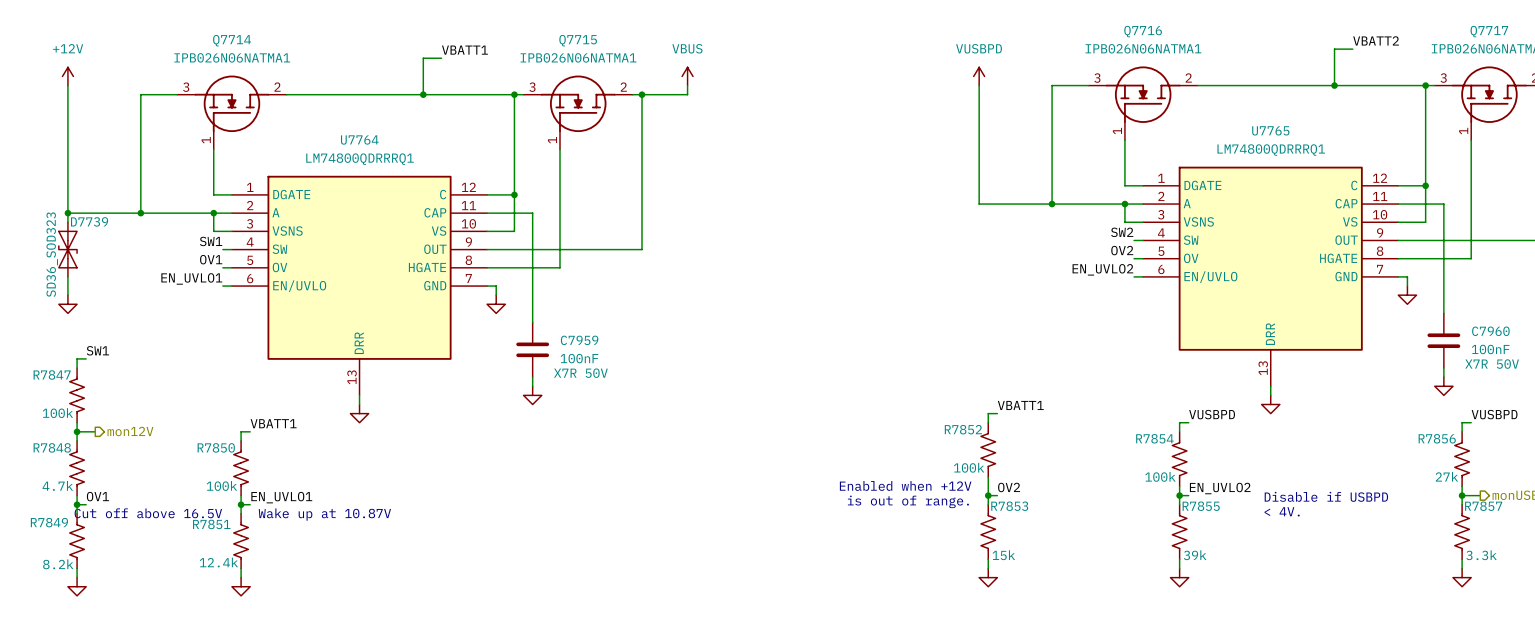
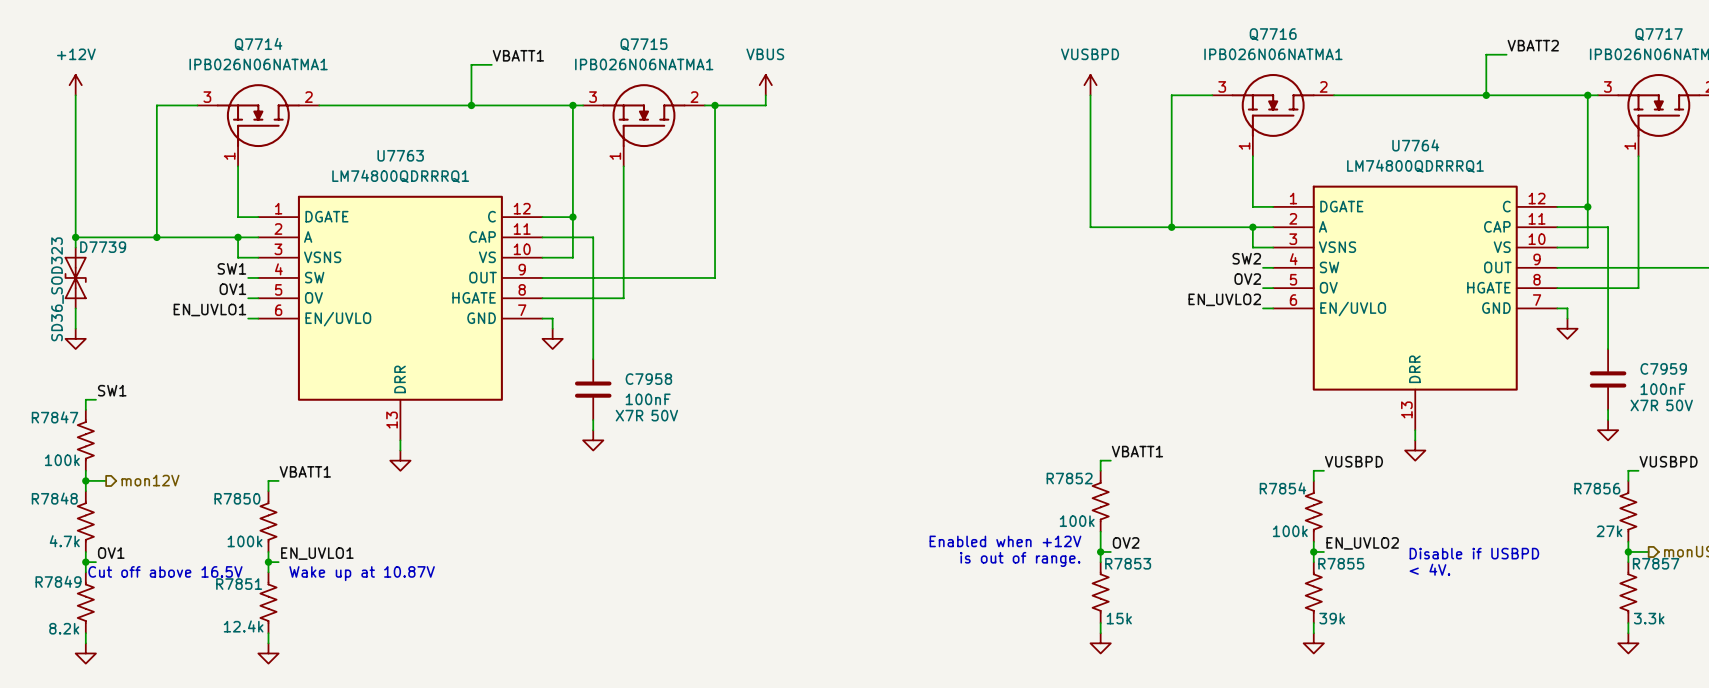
U7765 name: U7765 (1270, 130) -> U7764 (1415, 145)
U7764 name: U7764 (359, 139) -> U7763 (400, 155)
C7960 name: C7960 (1490, 331) -> C7959 (1663, 368)
C7959 name: C7959 (579, 340) -> C7958 (648, 379)

